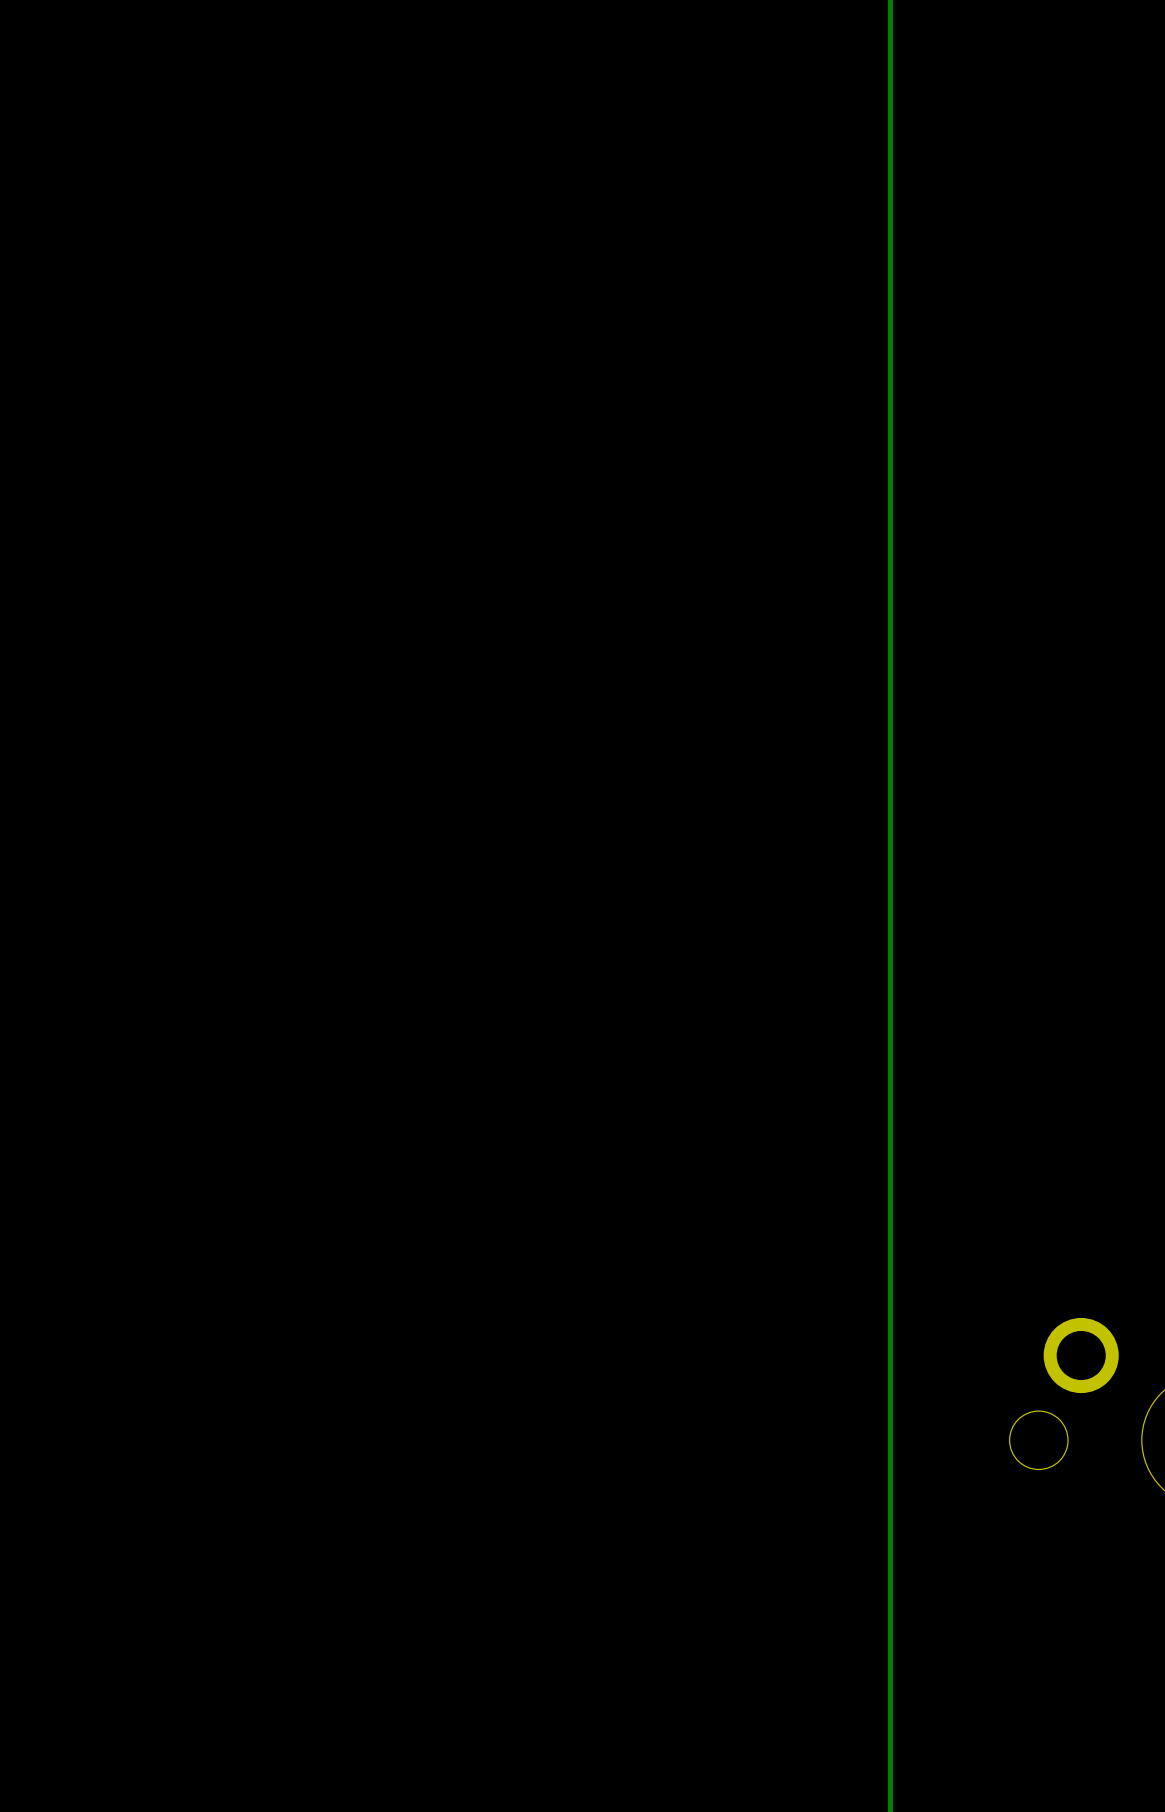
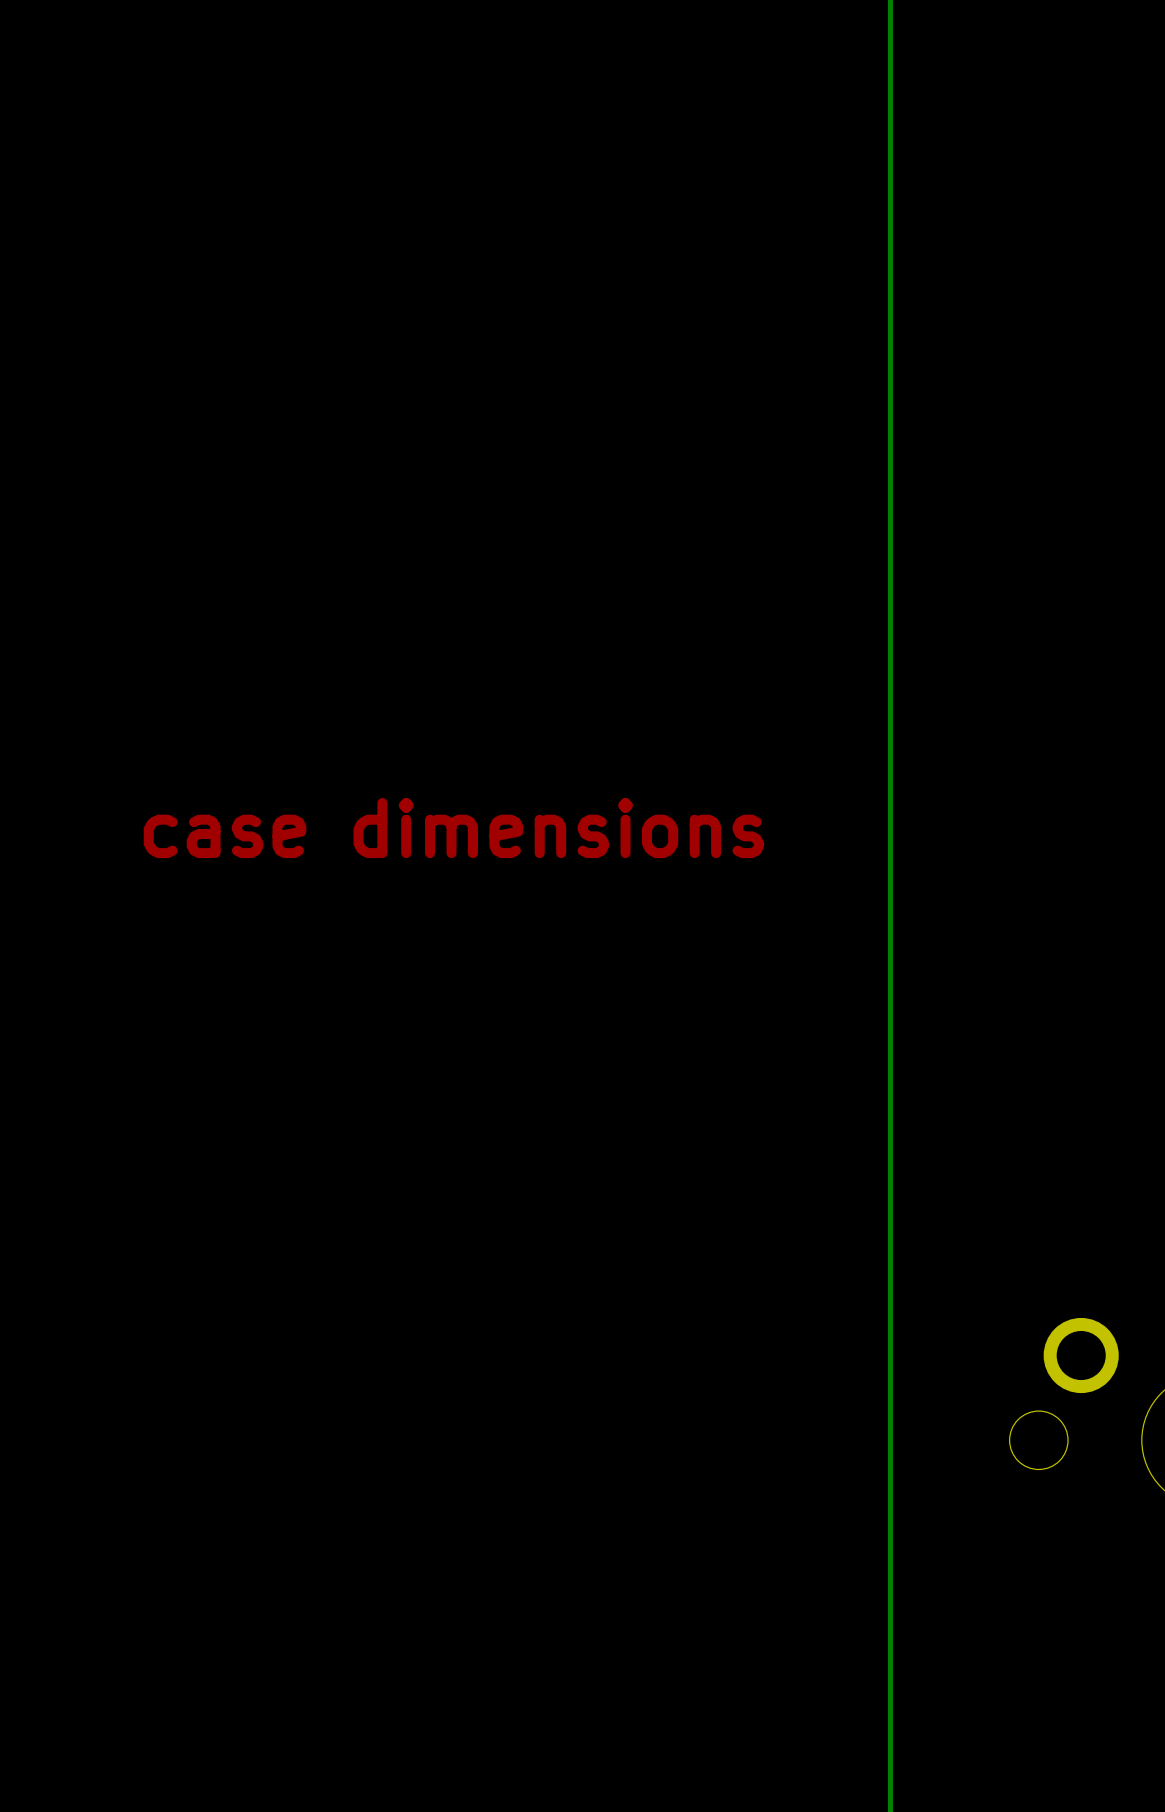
text: none -> case dimensions (453, 828)

